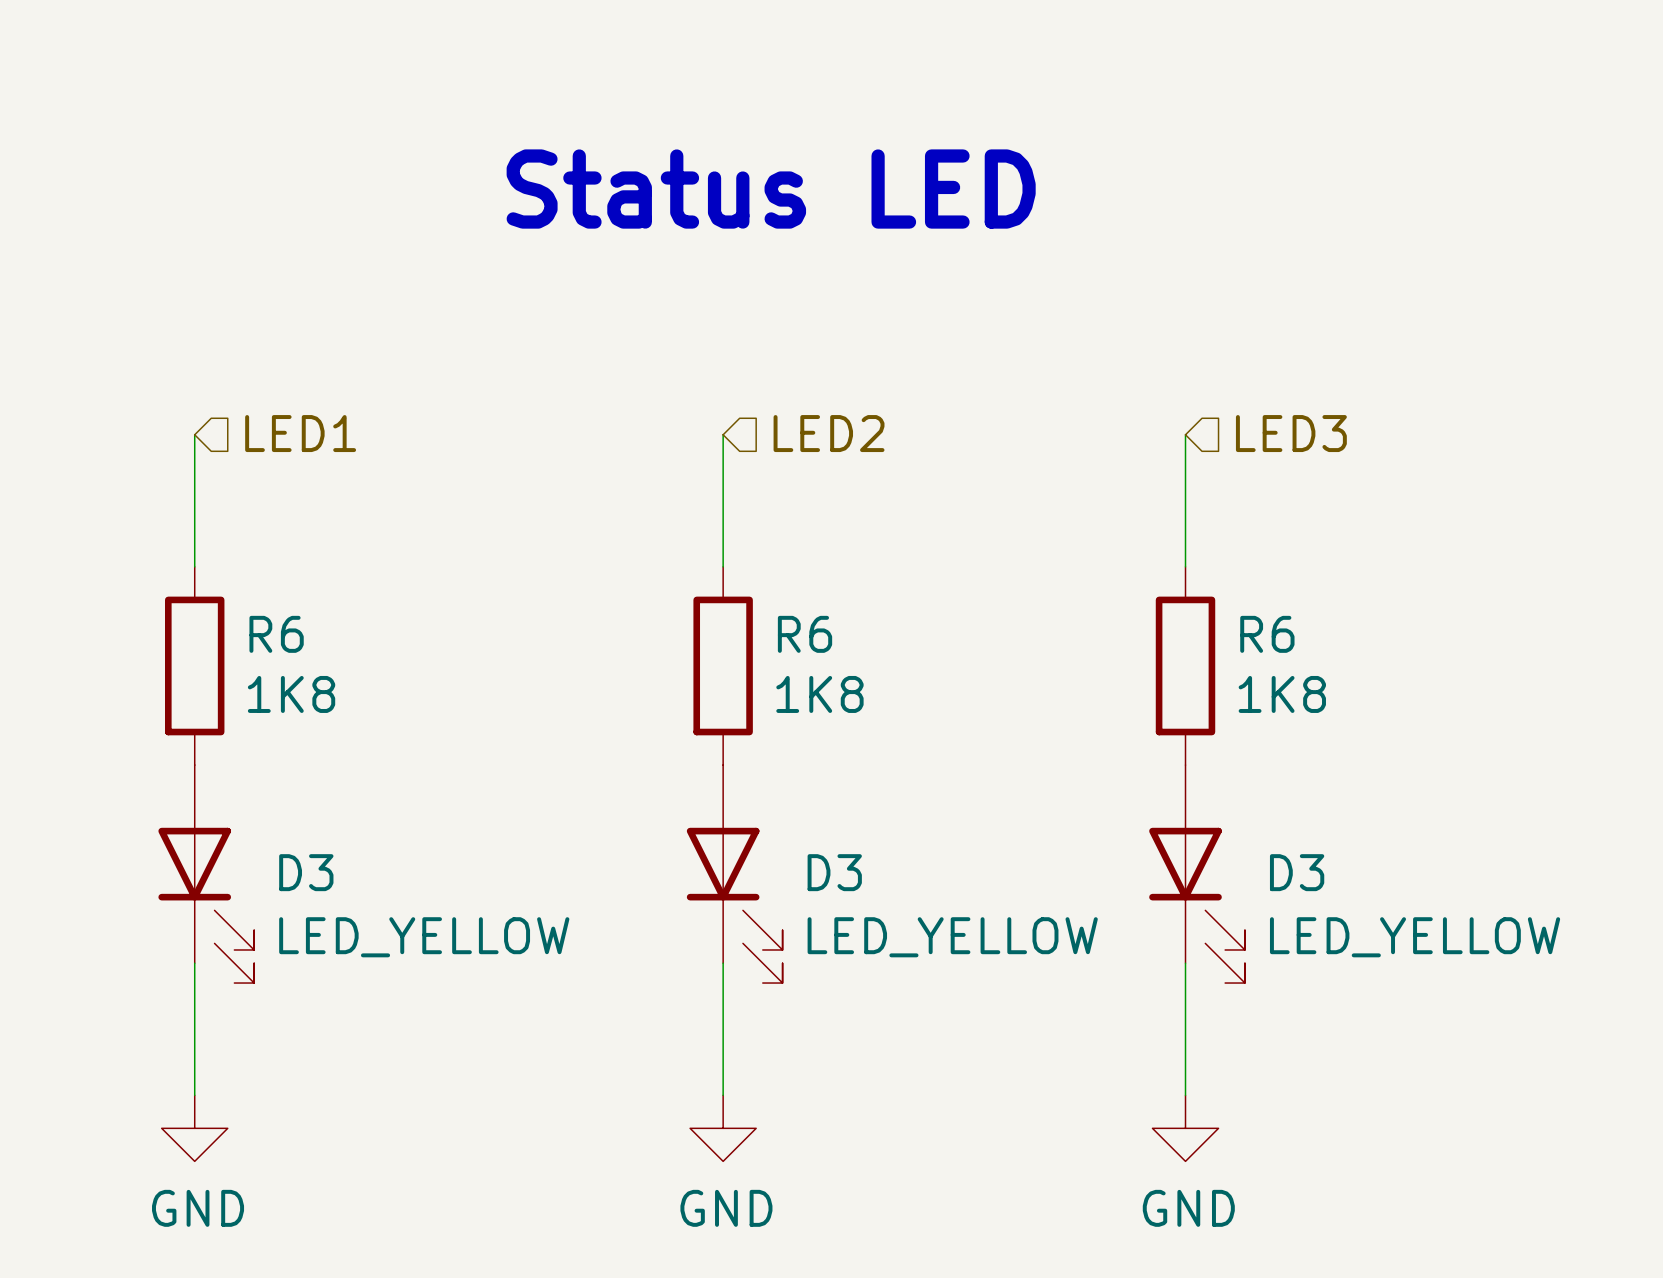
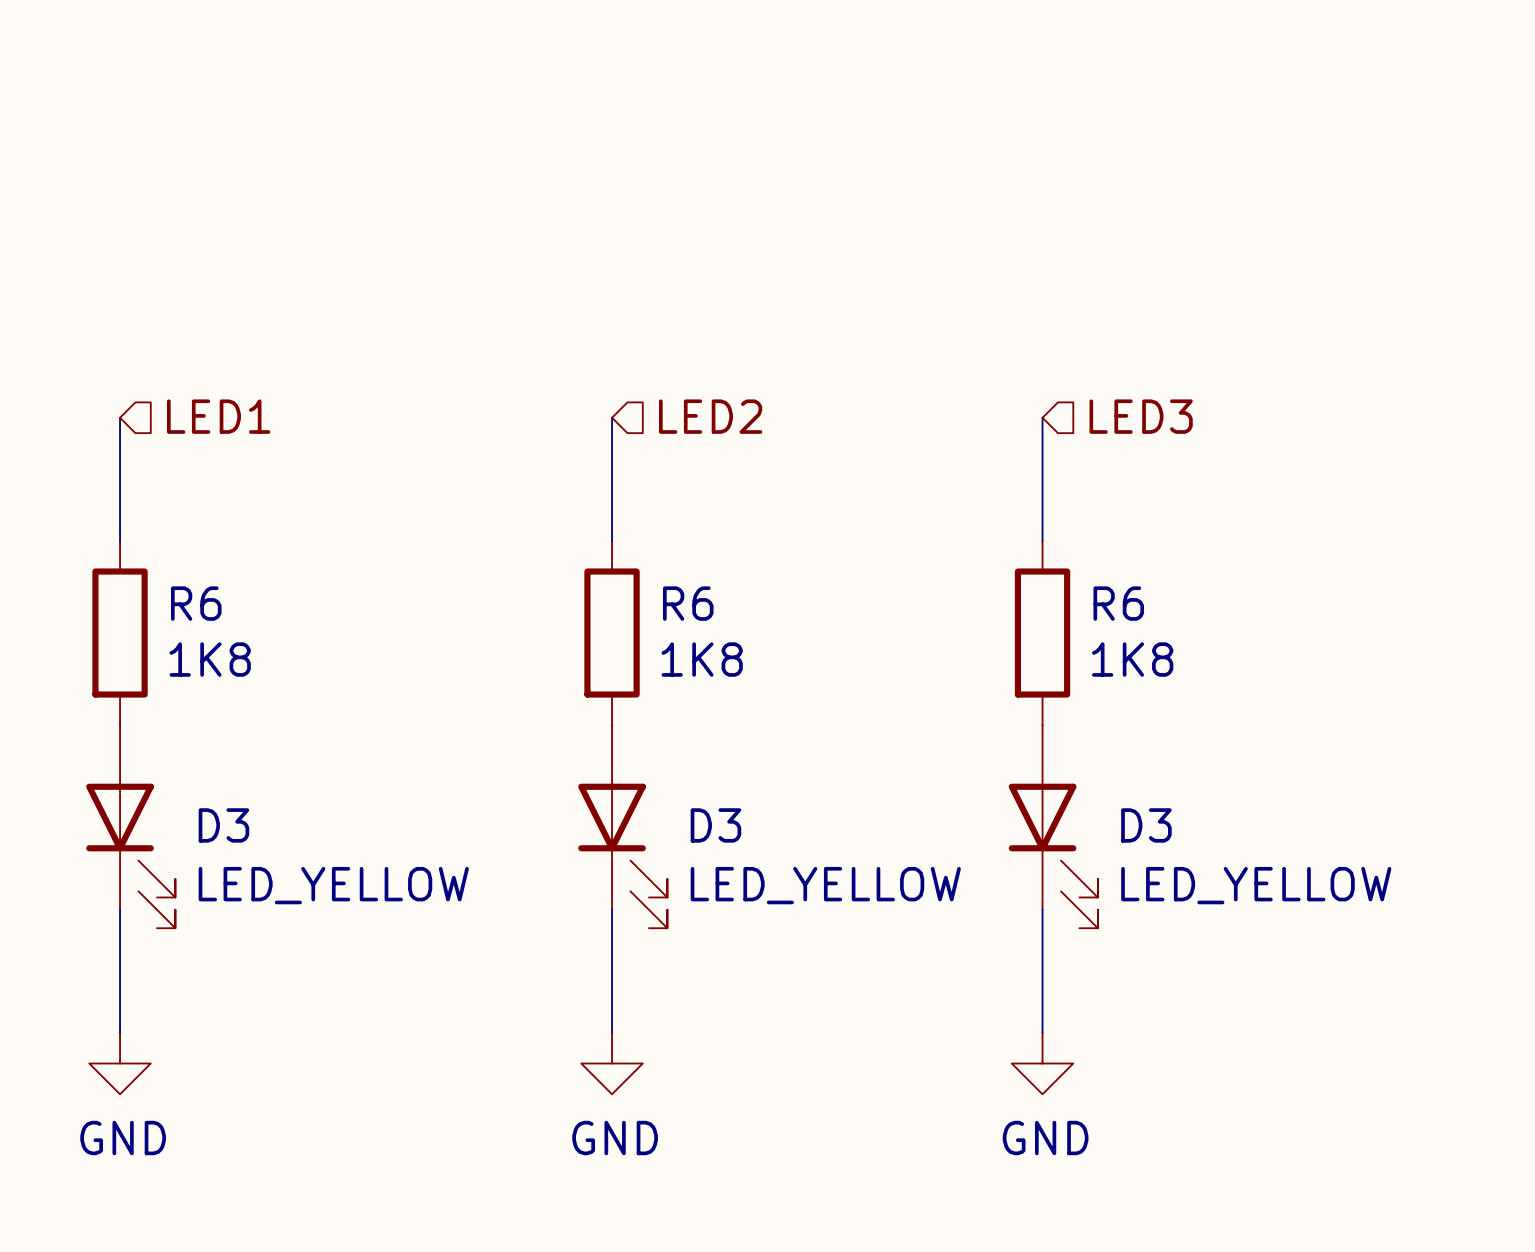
text: Status LED (771, 189) -> none

